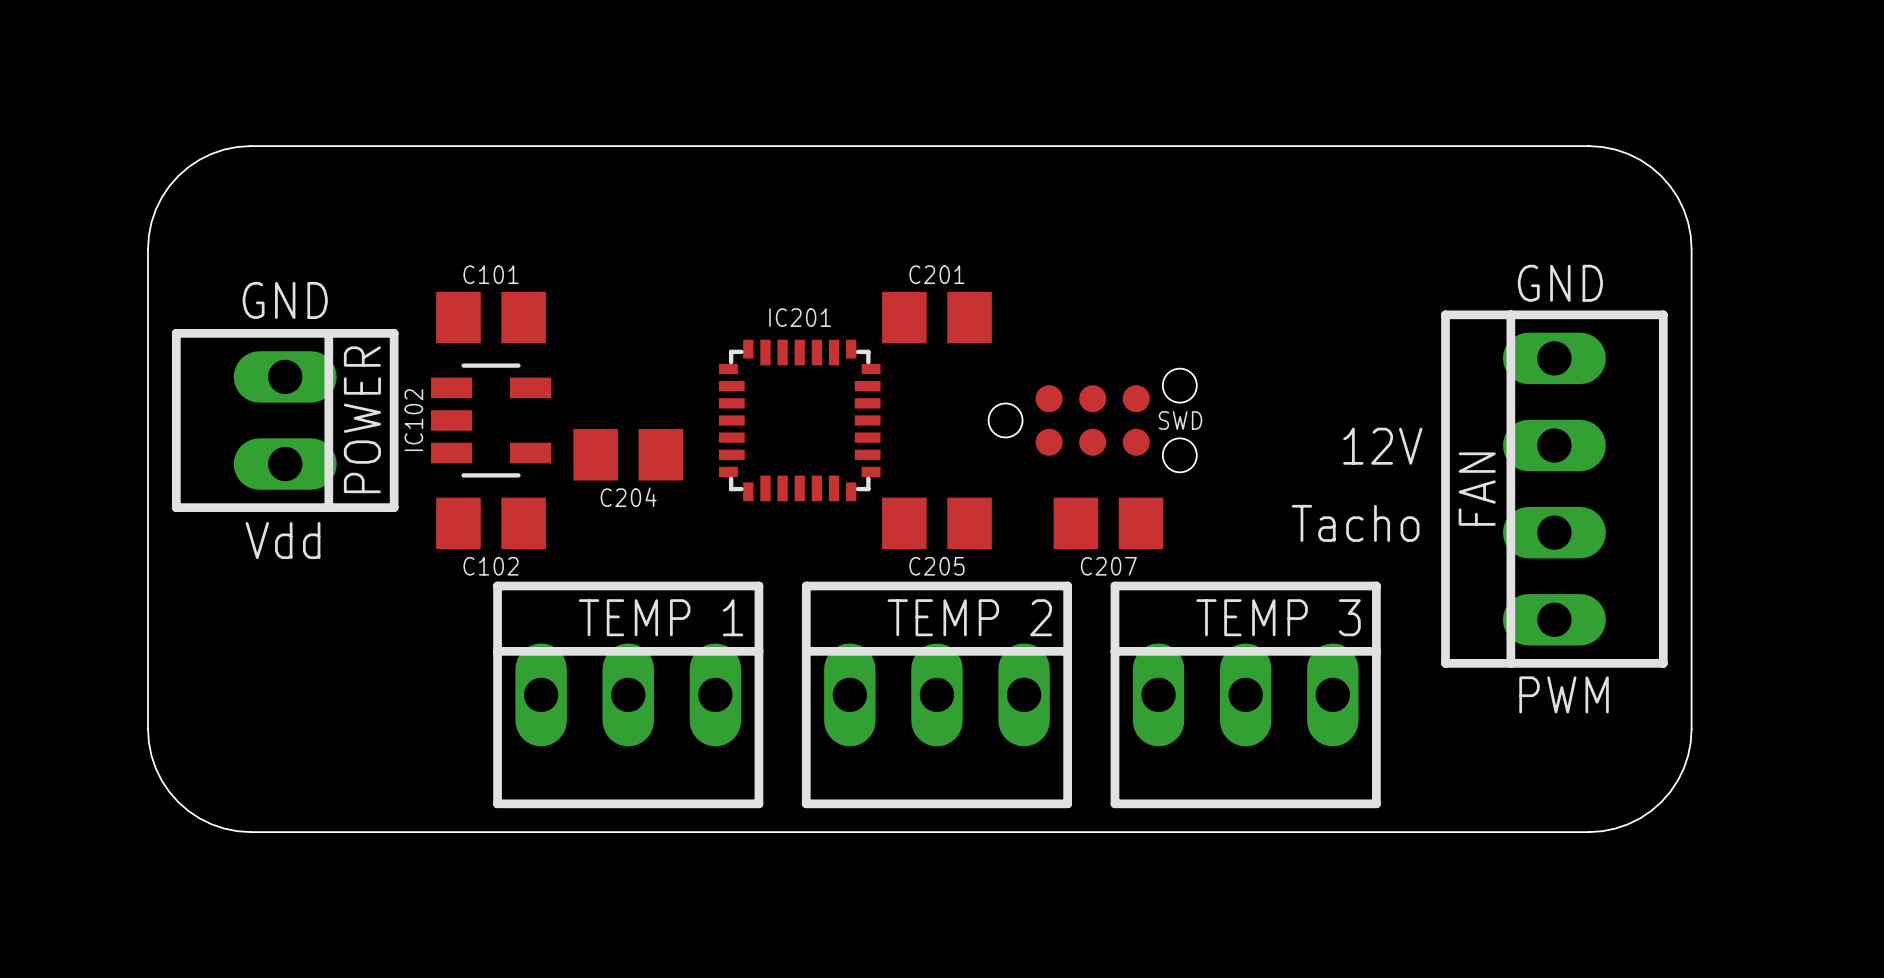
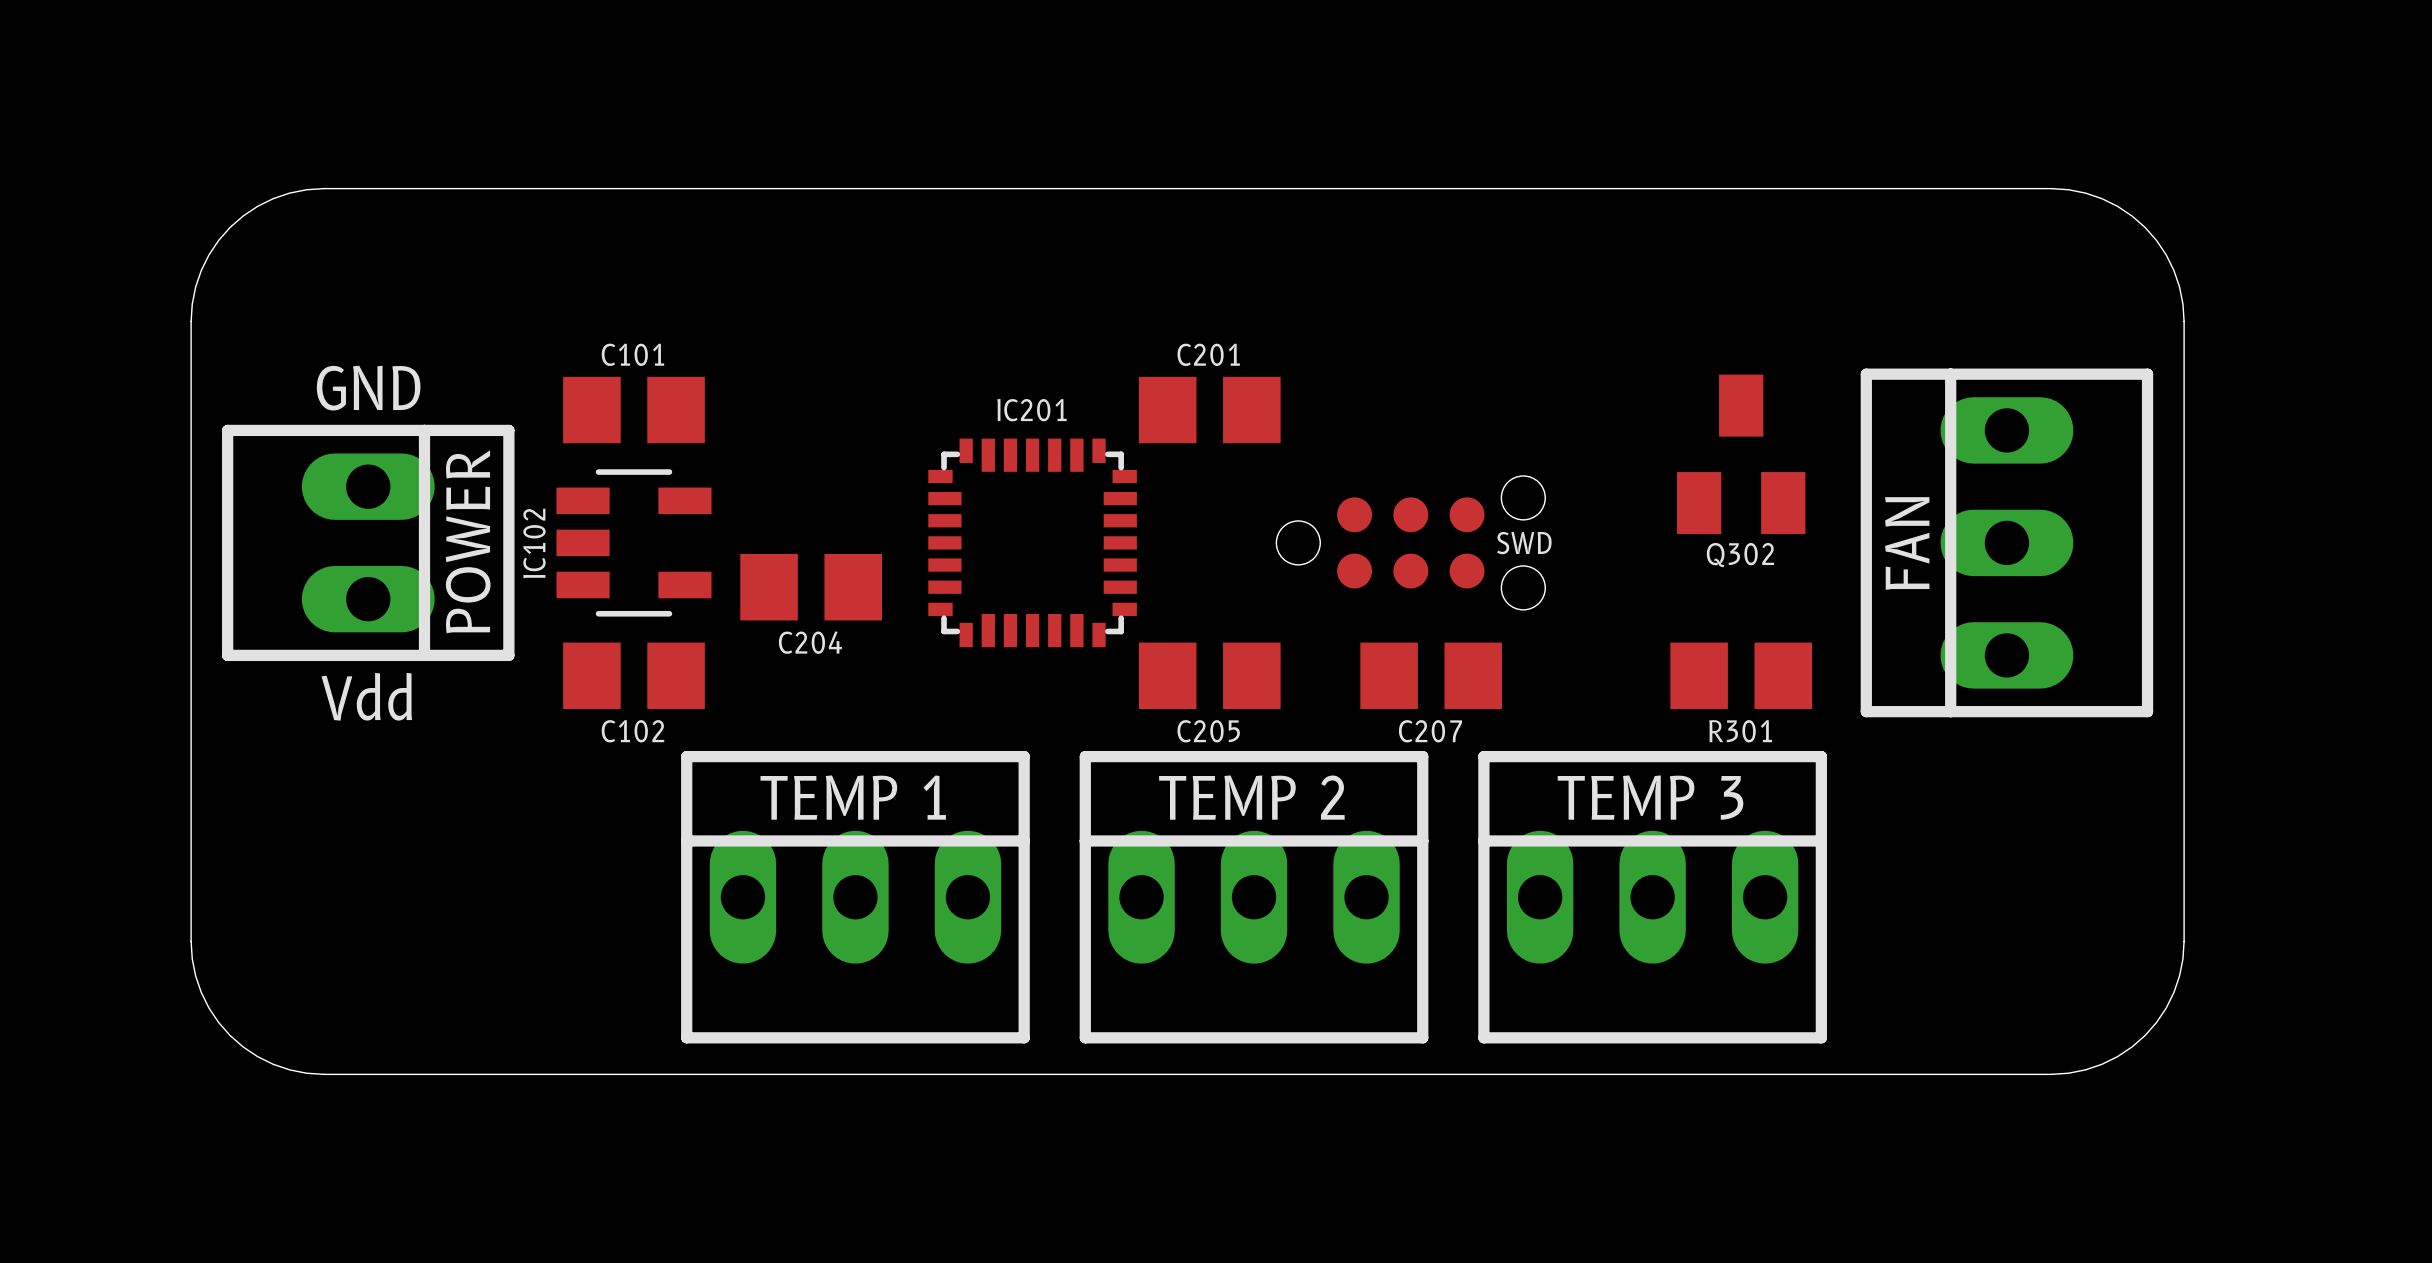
text: GND (1560, 283) -> none
Q302: none -> (1741, 454)
part: none -> (2006, 542)
text: 12V (1382, 446) -> none
text position: FAN (1477, 489) -> FAN (1907, 543)
part: (1554, 489) -> none
R301: none -> (1741, 675)
text: Tacho (1355, 523) -> none
part position: (628, 694) -> (855, 897)
part position: (936, 694) -> (1254, 897)
part position: (1245, 694) -> (1652, 897)
text: PWM (1564, 694) -> none

